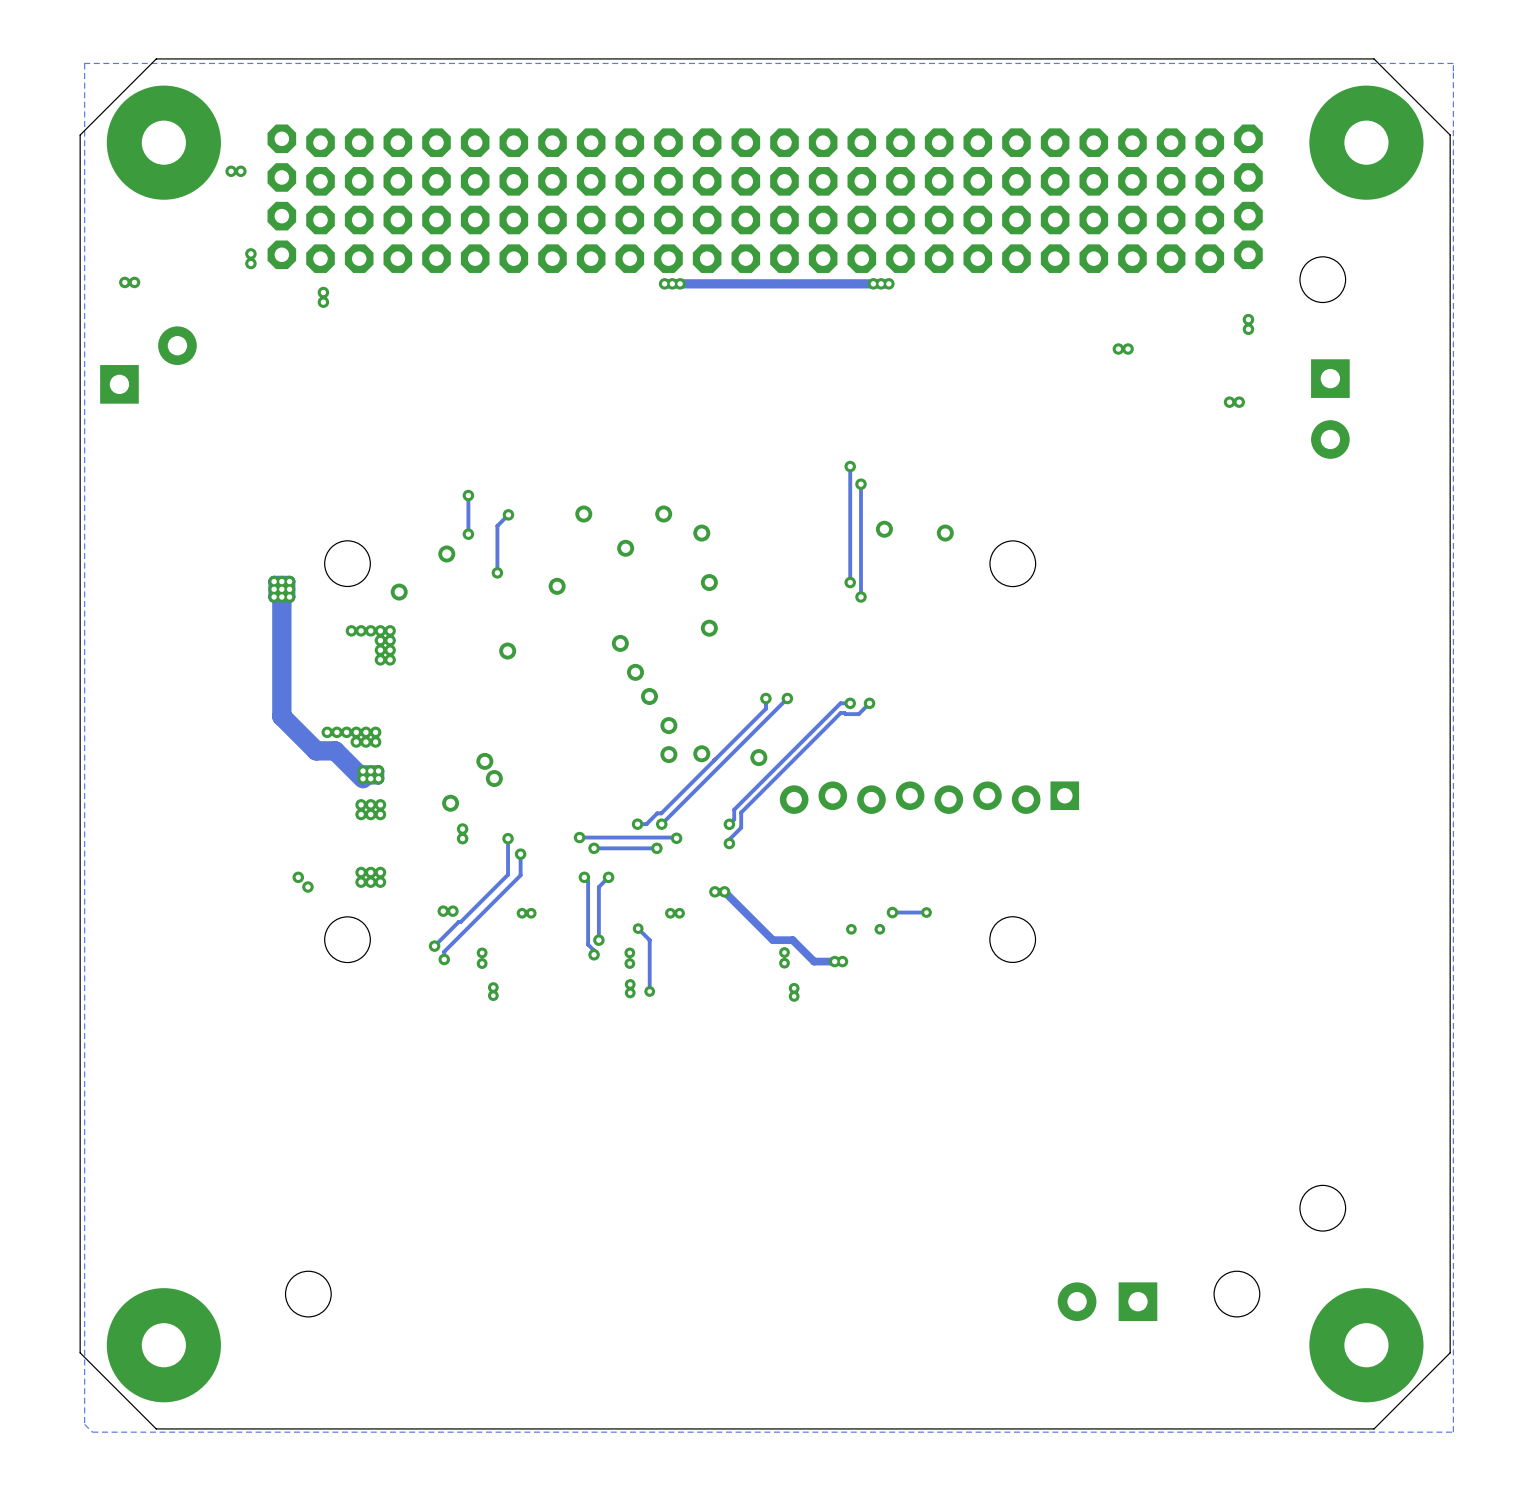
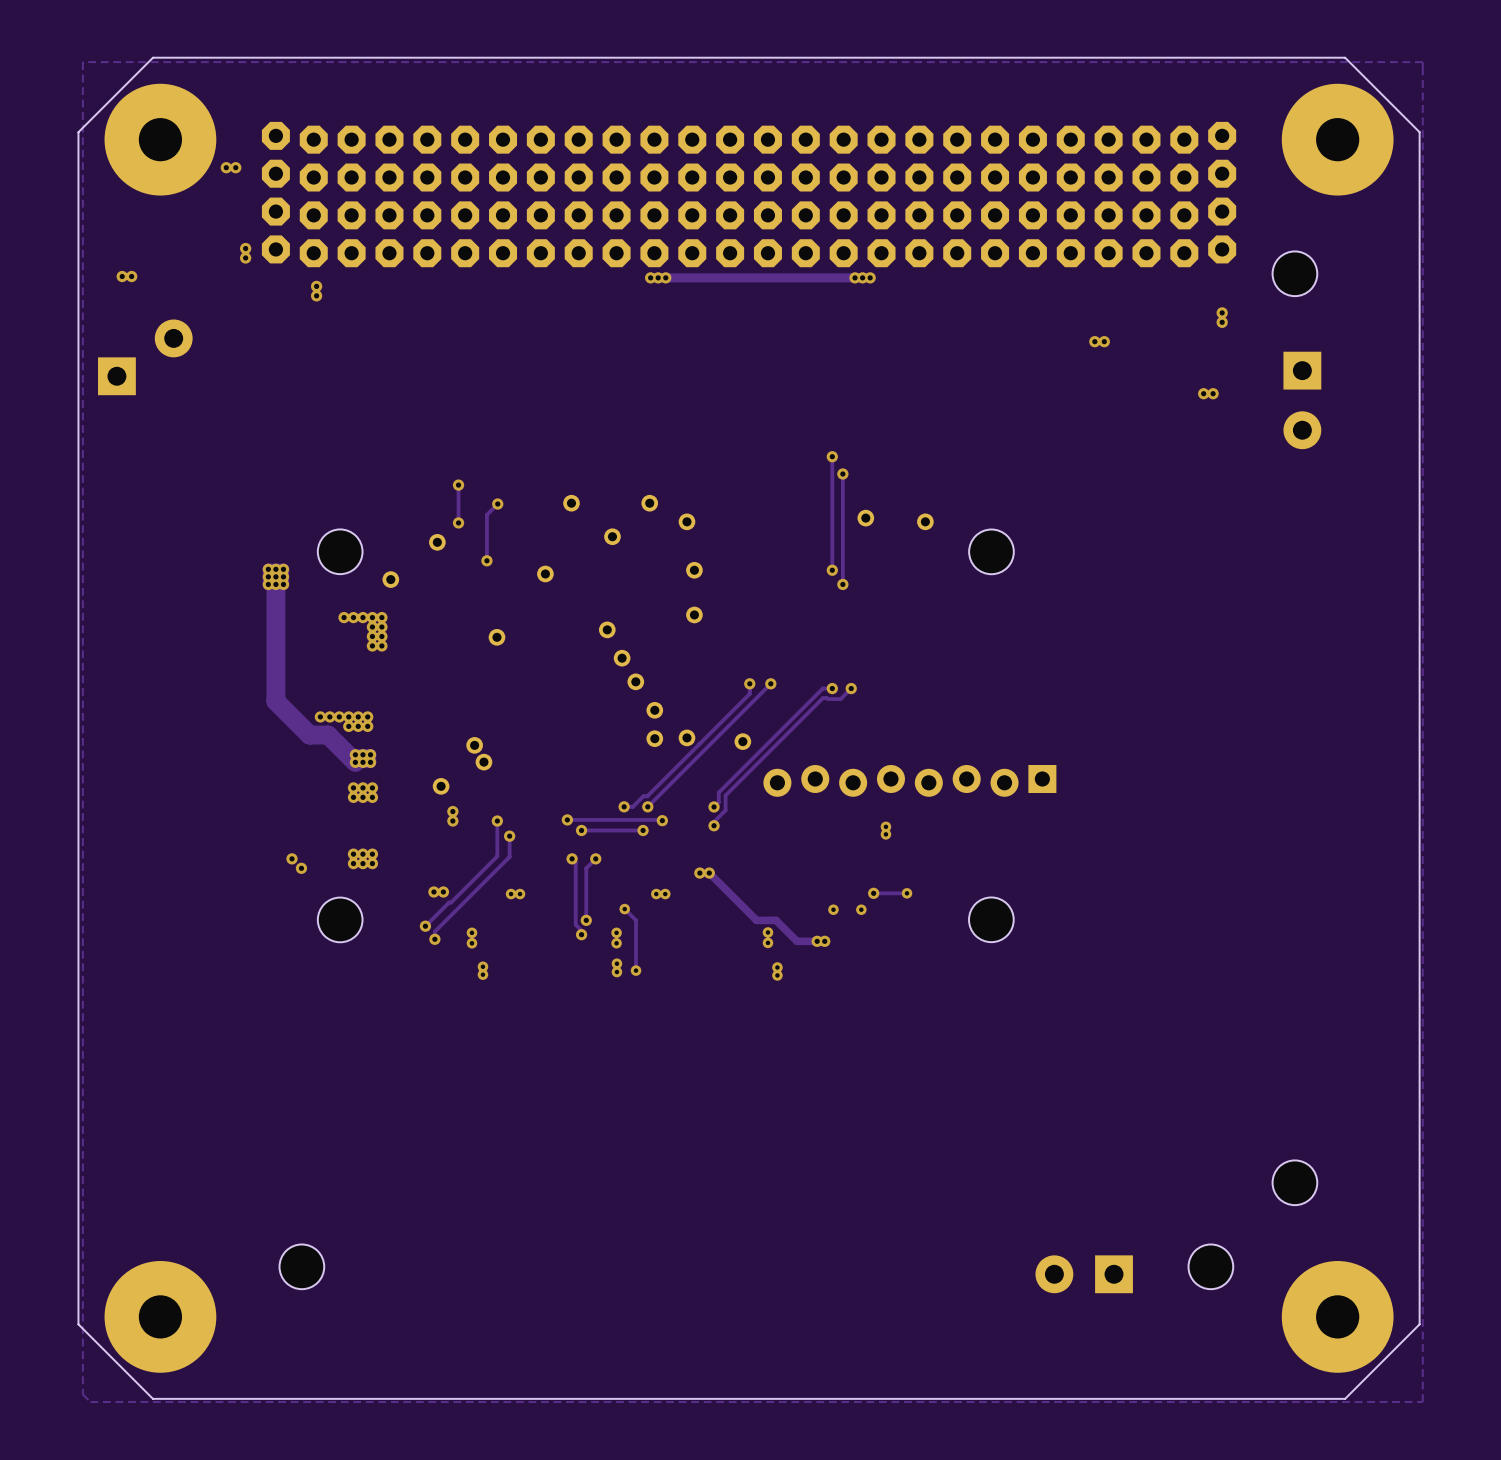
via: none -> (885, 826)
via: none -> (885, 834)

